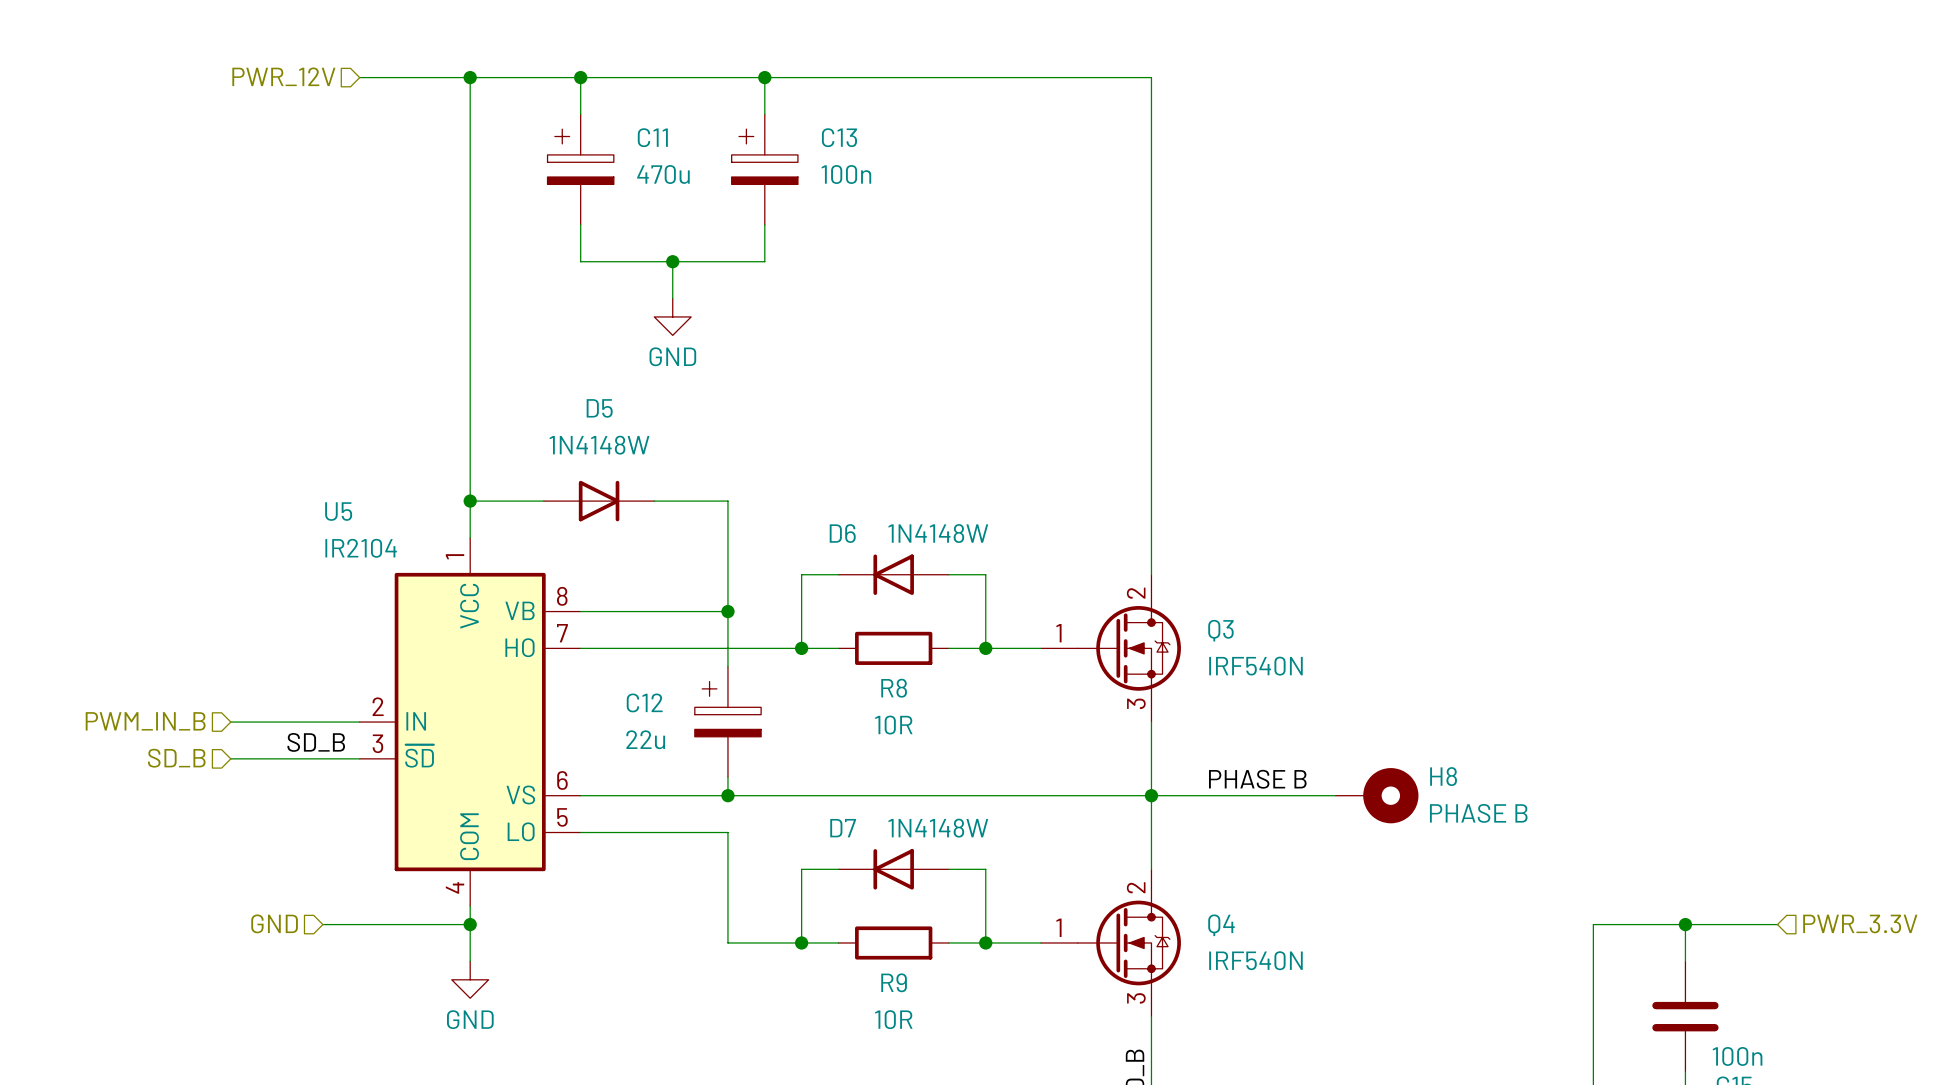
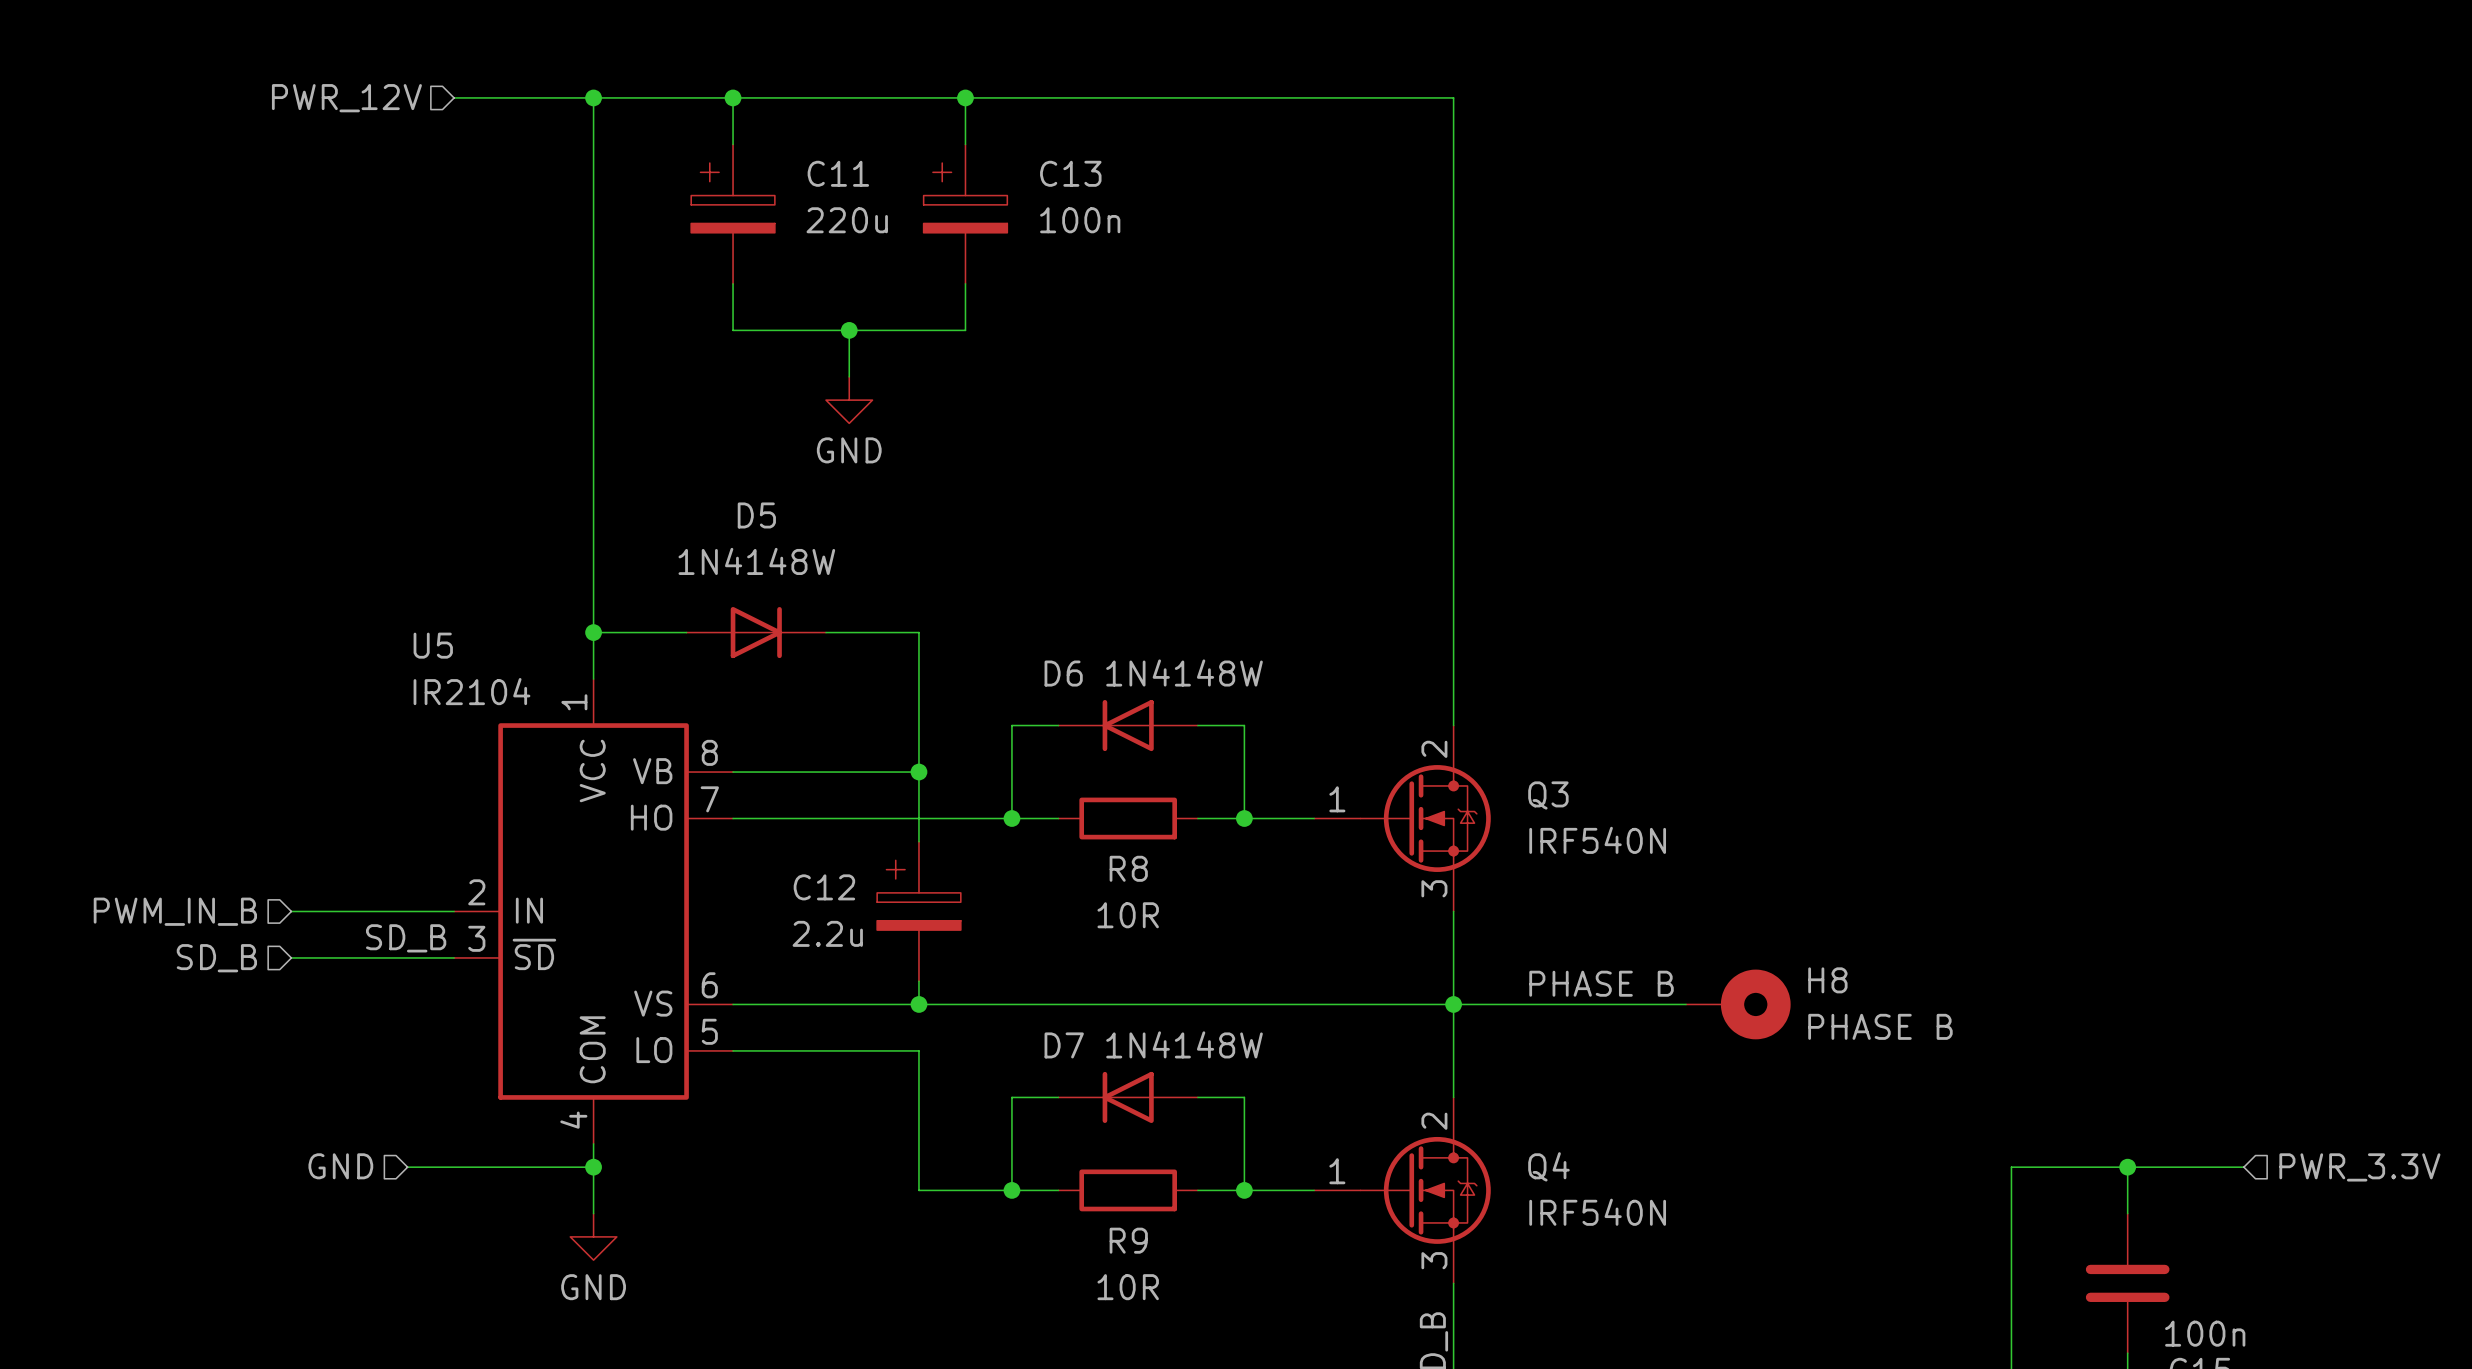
C11 value: 470u (663, 174) -> 220u (847, 220)
C12 value: 22u (645, 739) -> 2.2u (827, 933)

